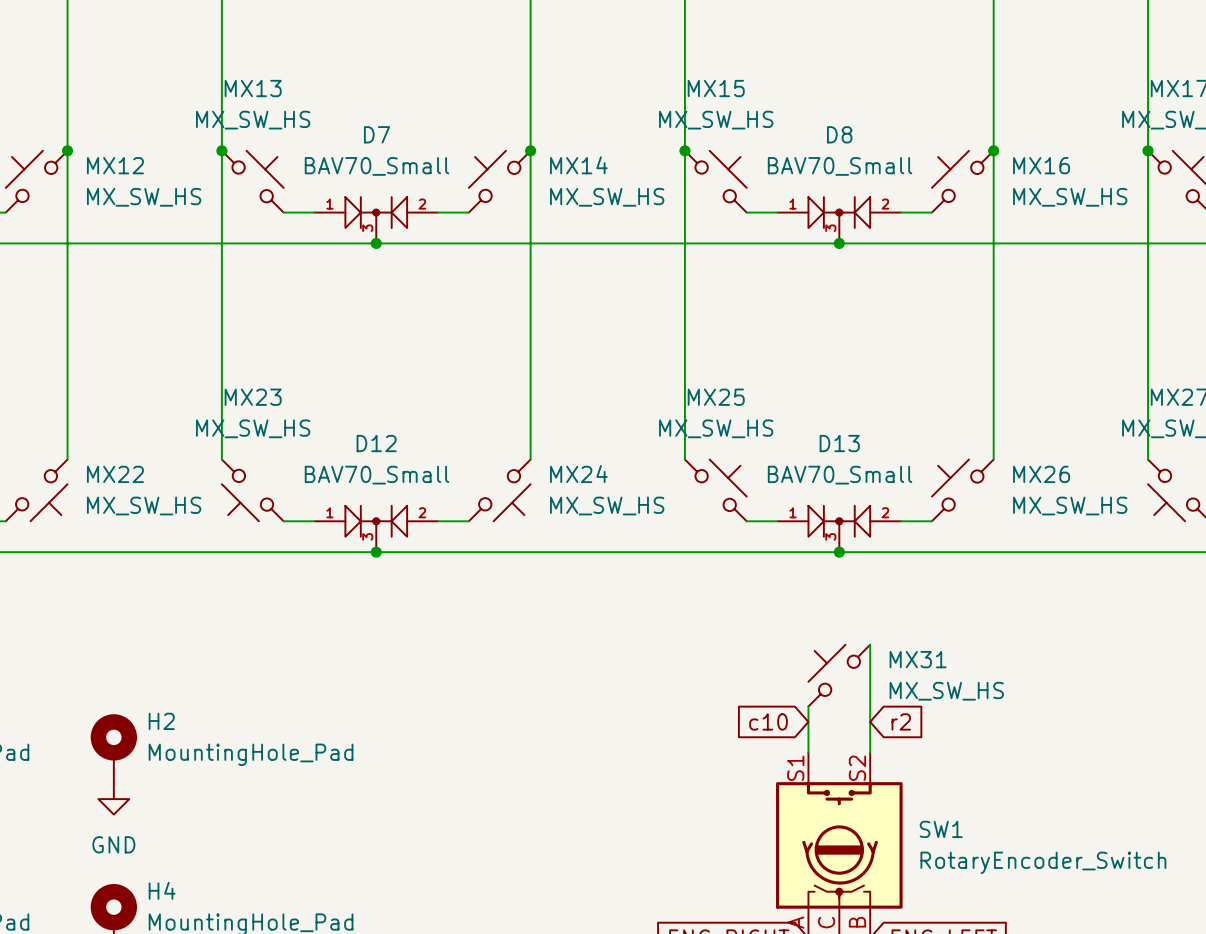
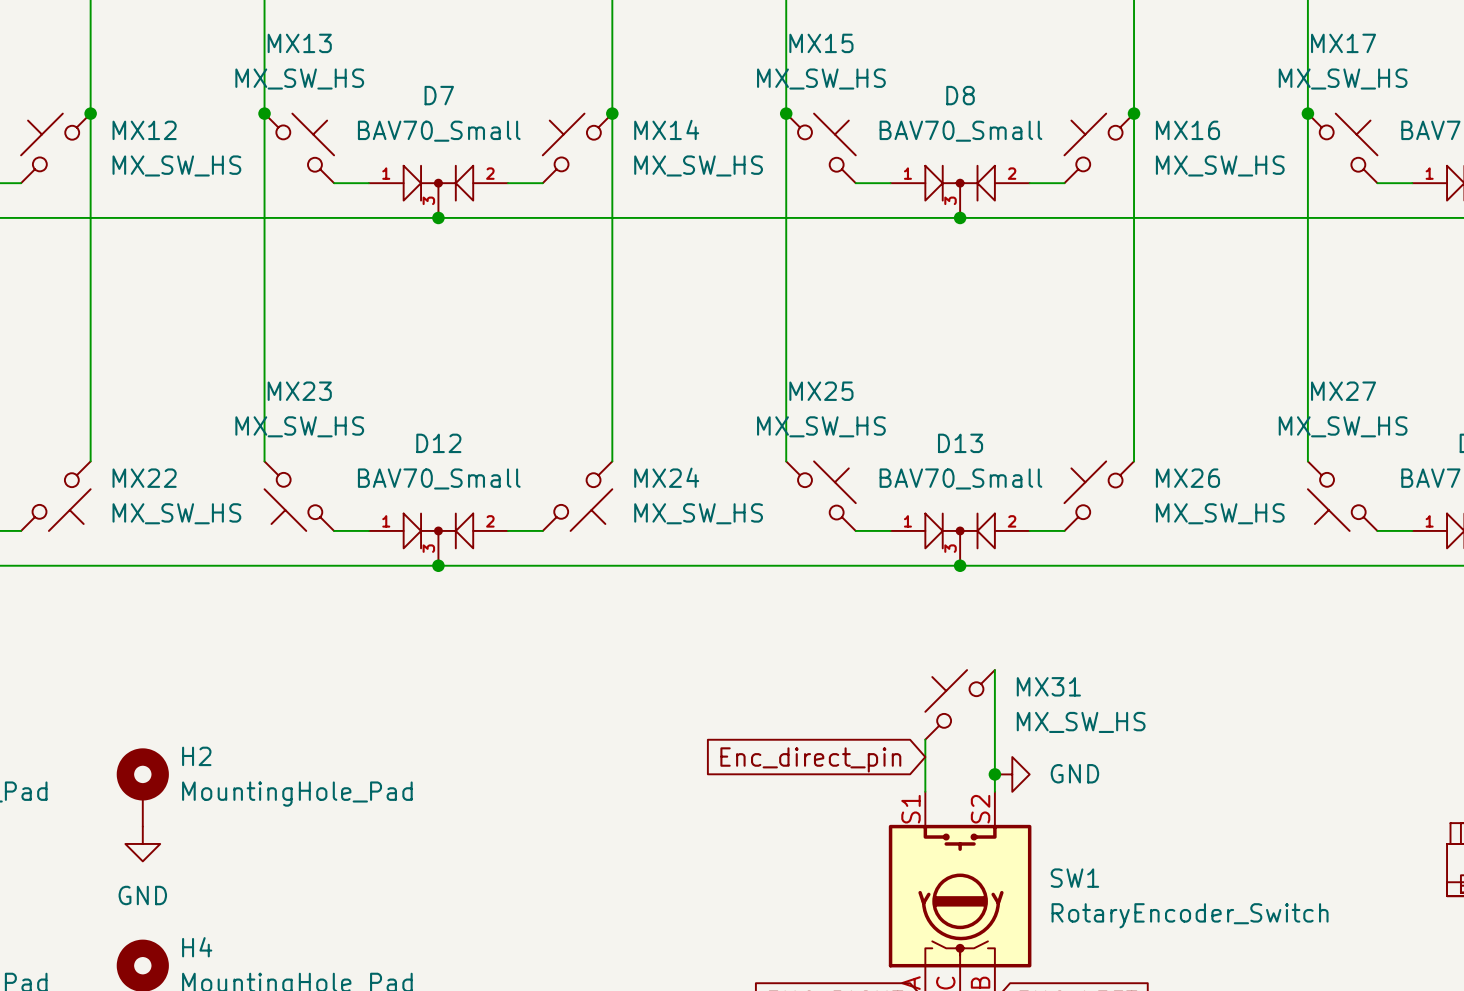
global label: c10 (768, 721) -> Enc_direct_pin (810, 759)
global label: r2 (901, 721) -> none
junction: none -> (994, 774)
power symbol: none -> GND (1012, 774)

